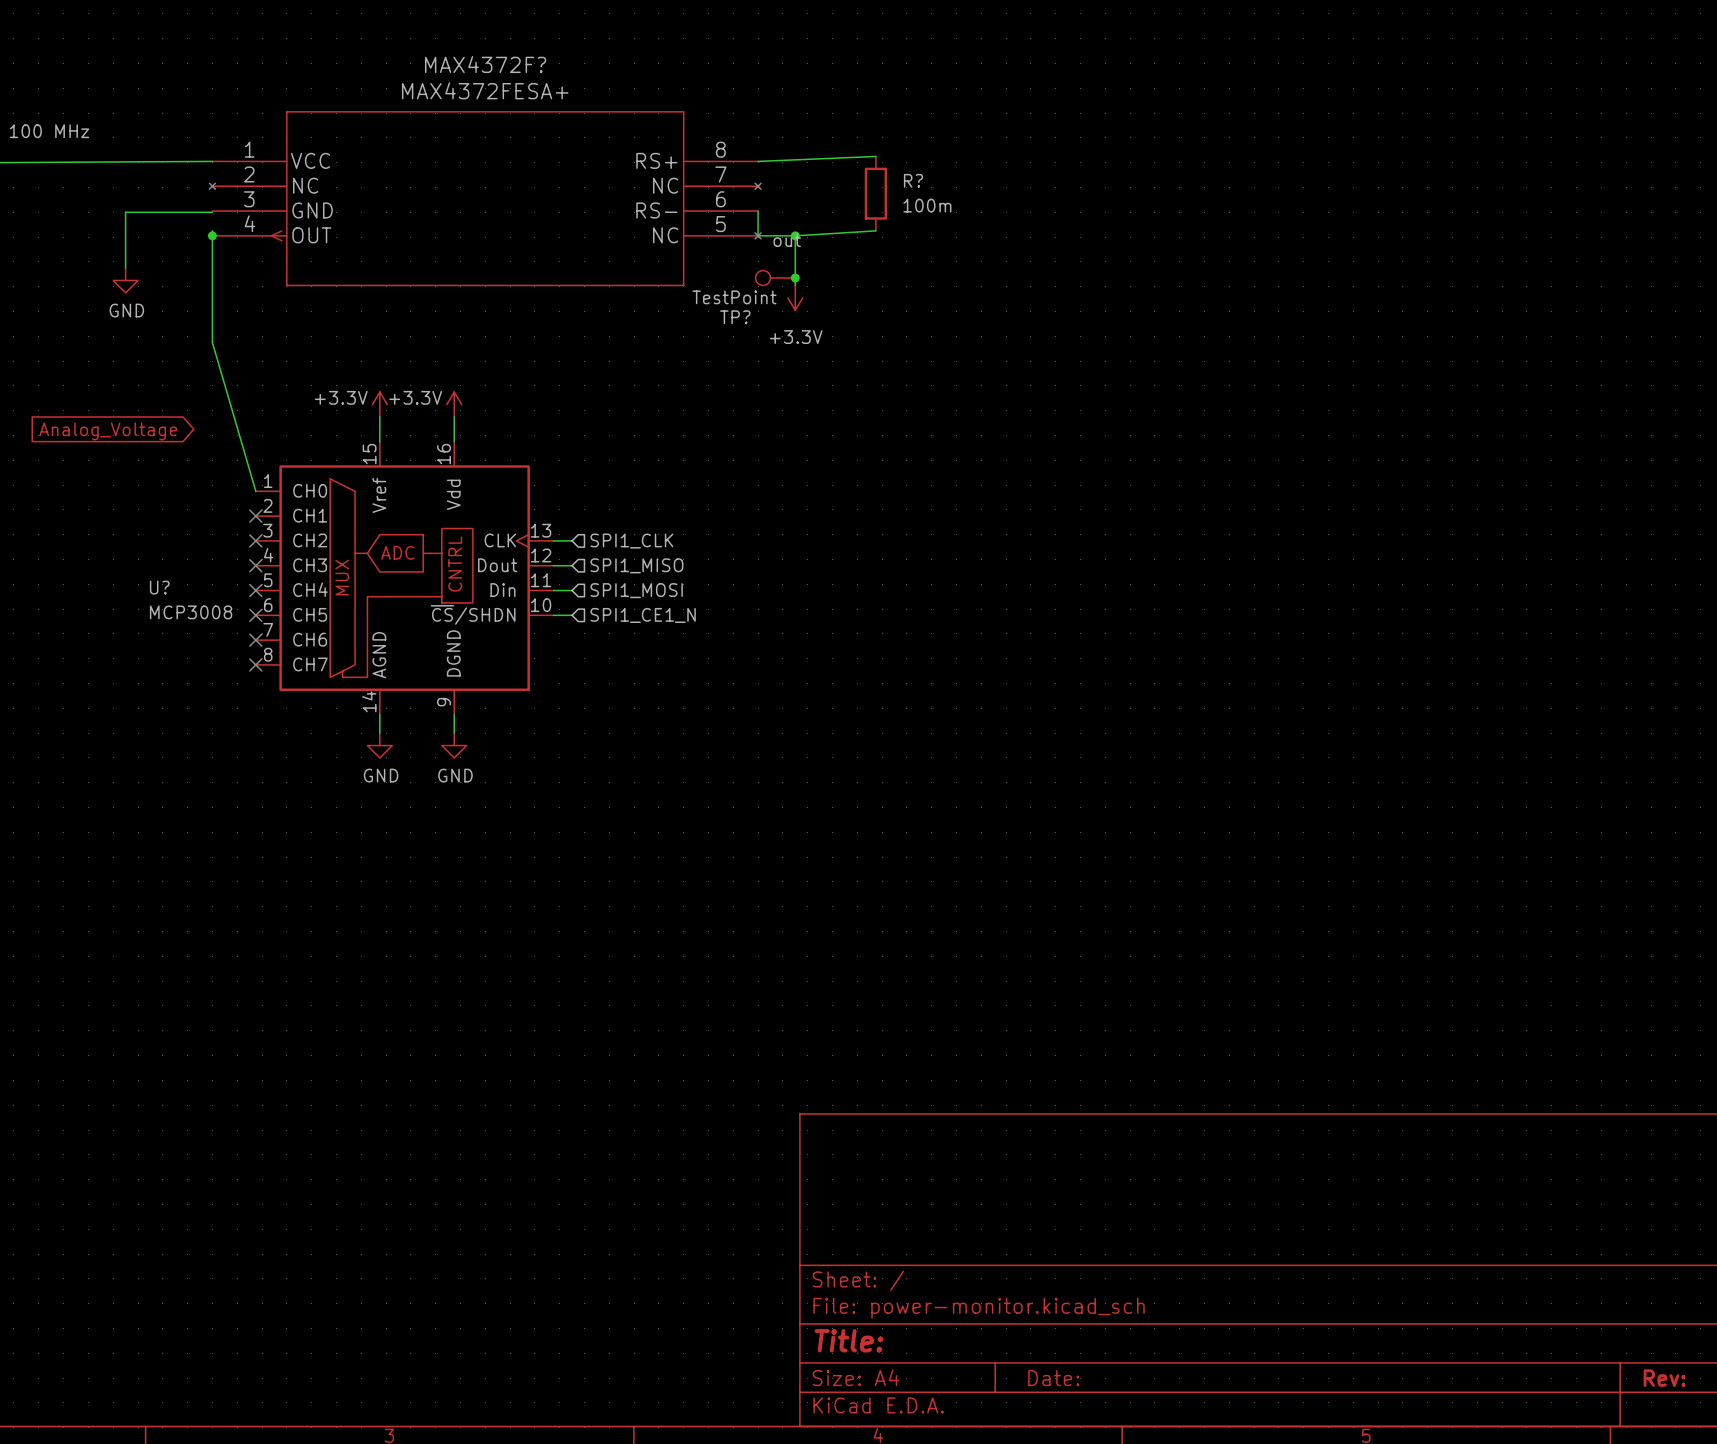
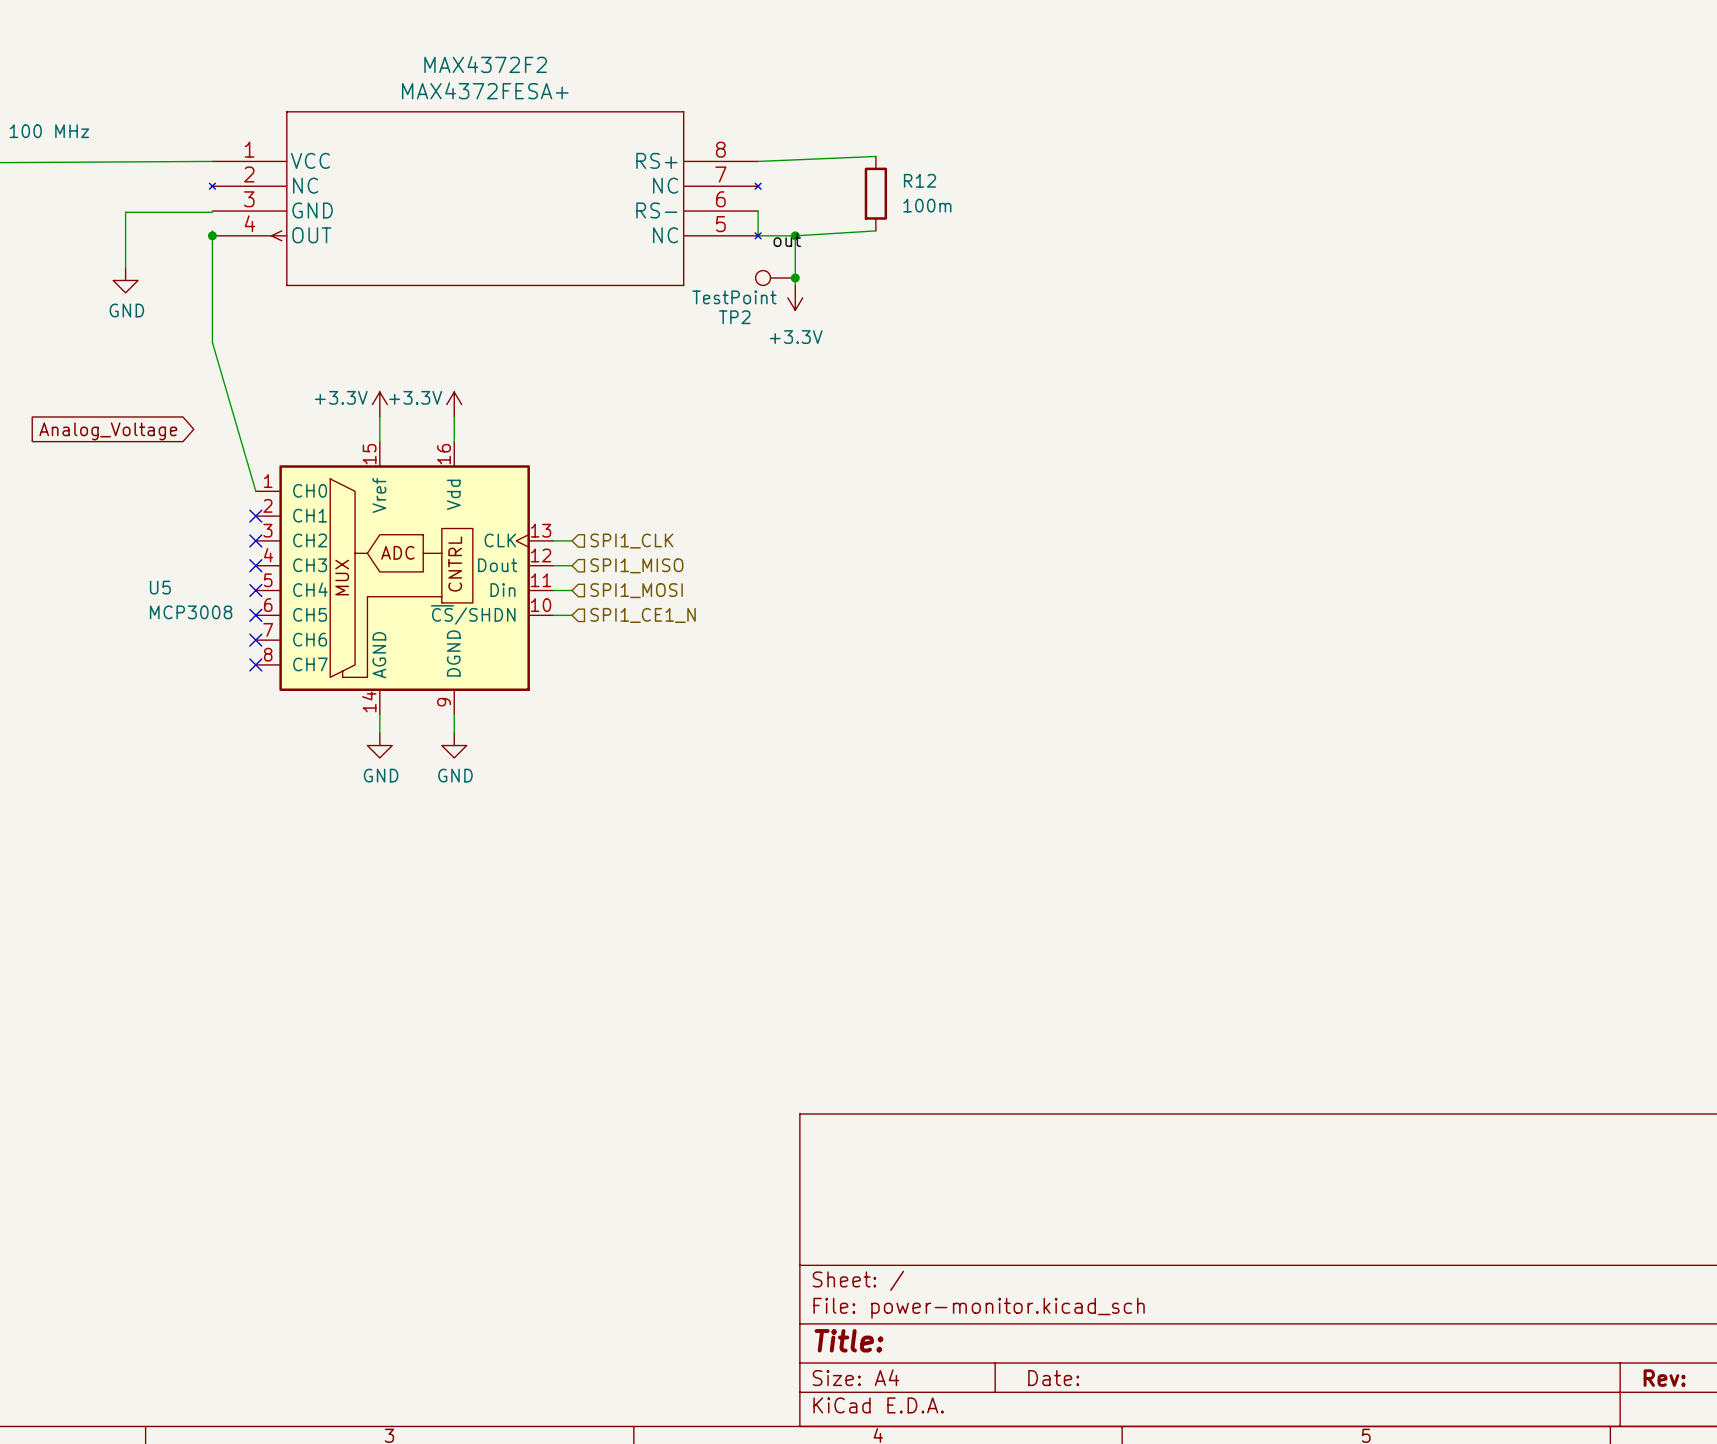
MAX4372F? name: MAX4372F? (485, 64) -> MAX4372F2 (485, 64)
R? name: R? (913, 180) -> R12 (919, 180)
TP? name: TP? (735, 317) -> TP2 (734, 317)
U? name: U? (159, 587) -> U5 (160, 587)

